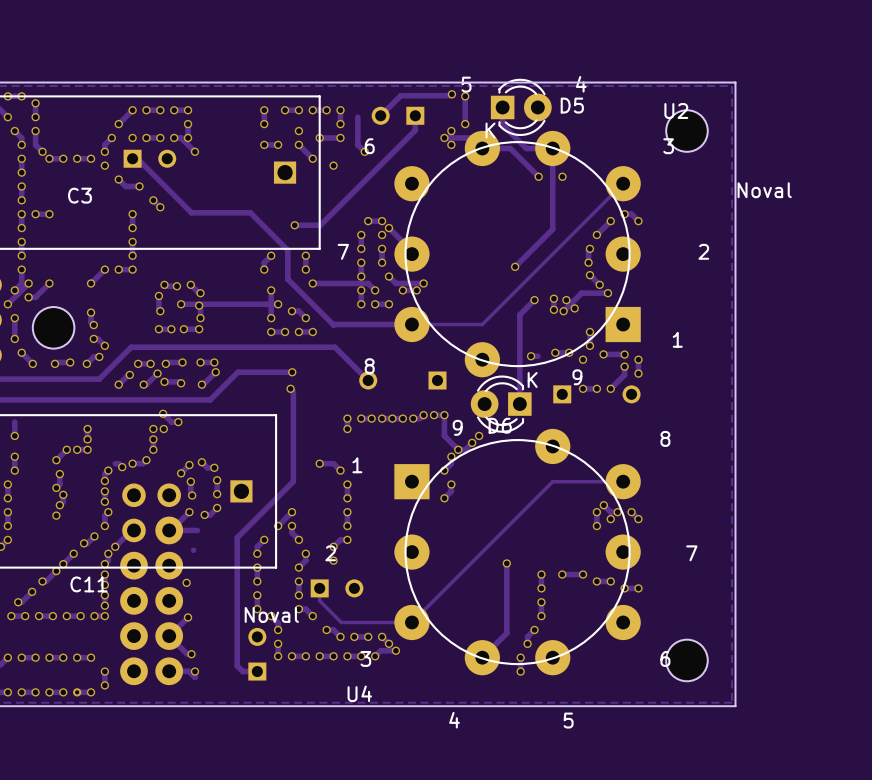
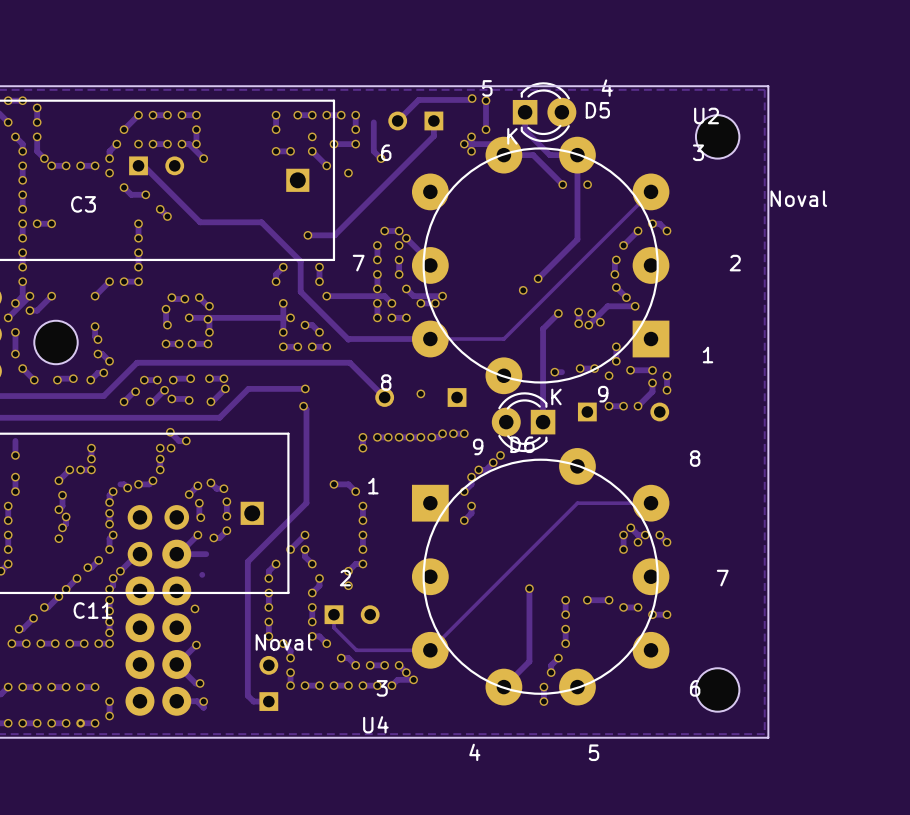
via: none -> (523, 290)
via: none -> (420, 393)
track: (444, 415) (444, 435) (458, 449) -> none

